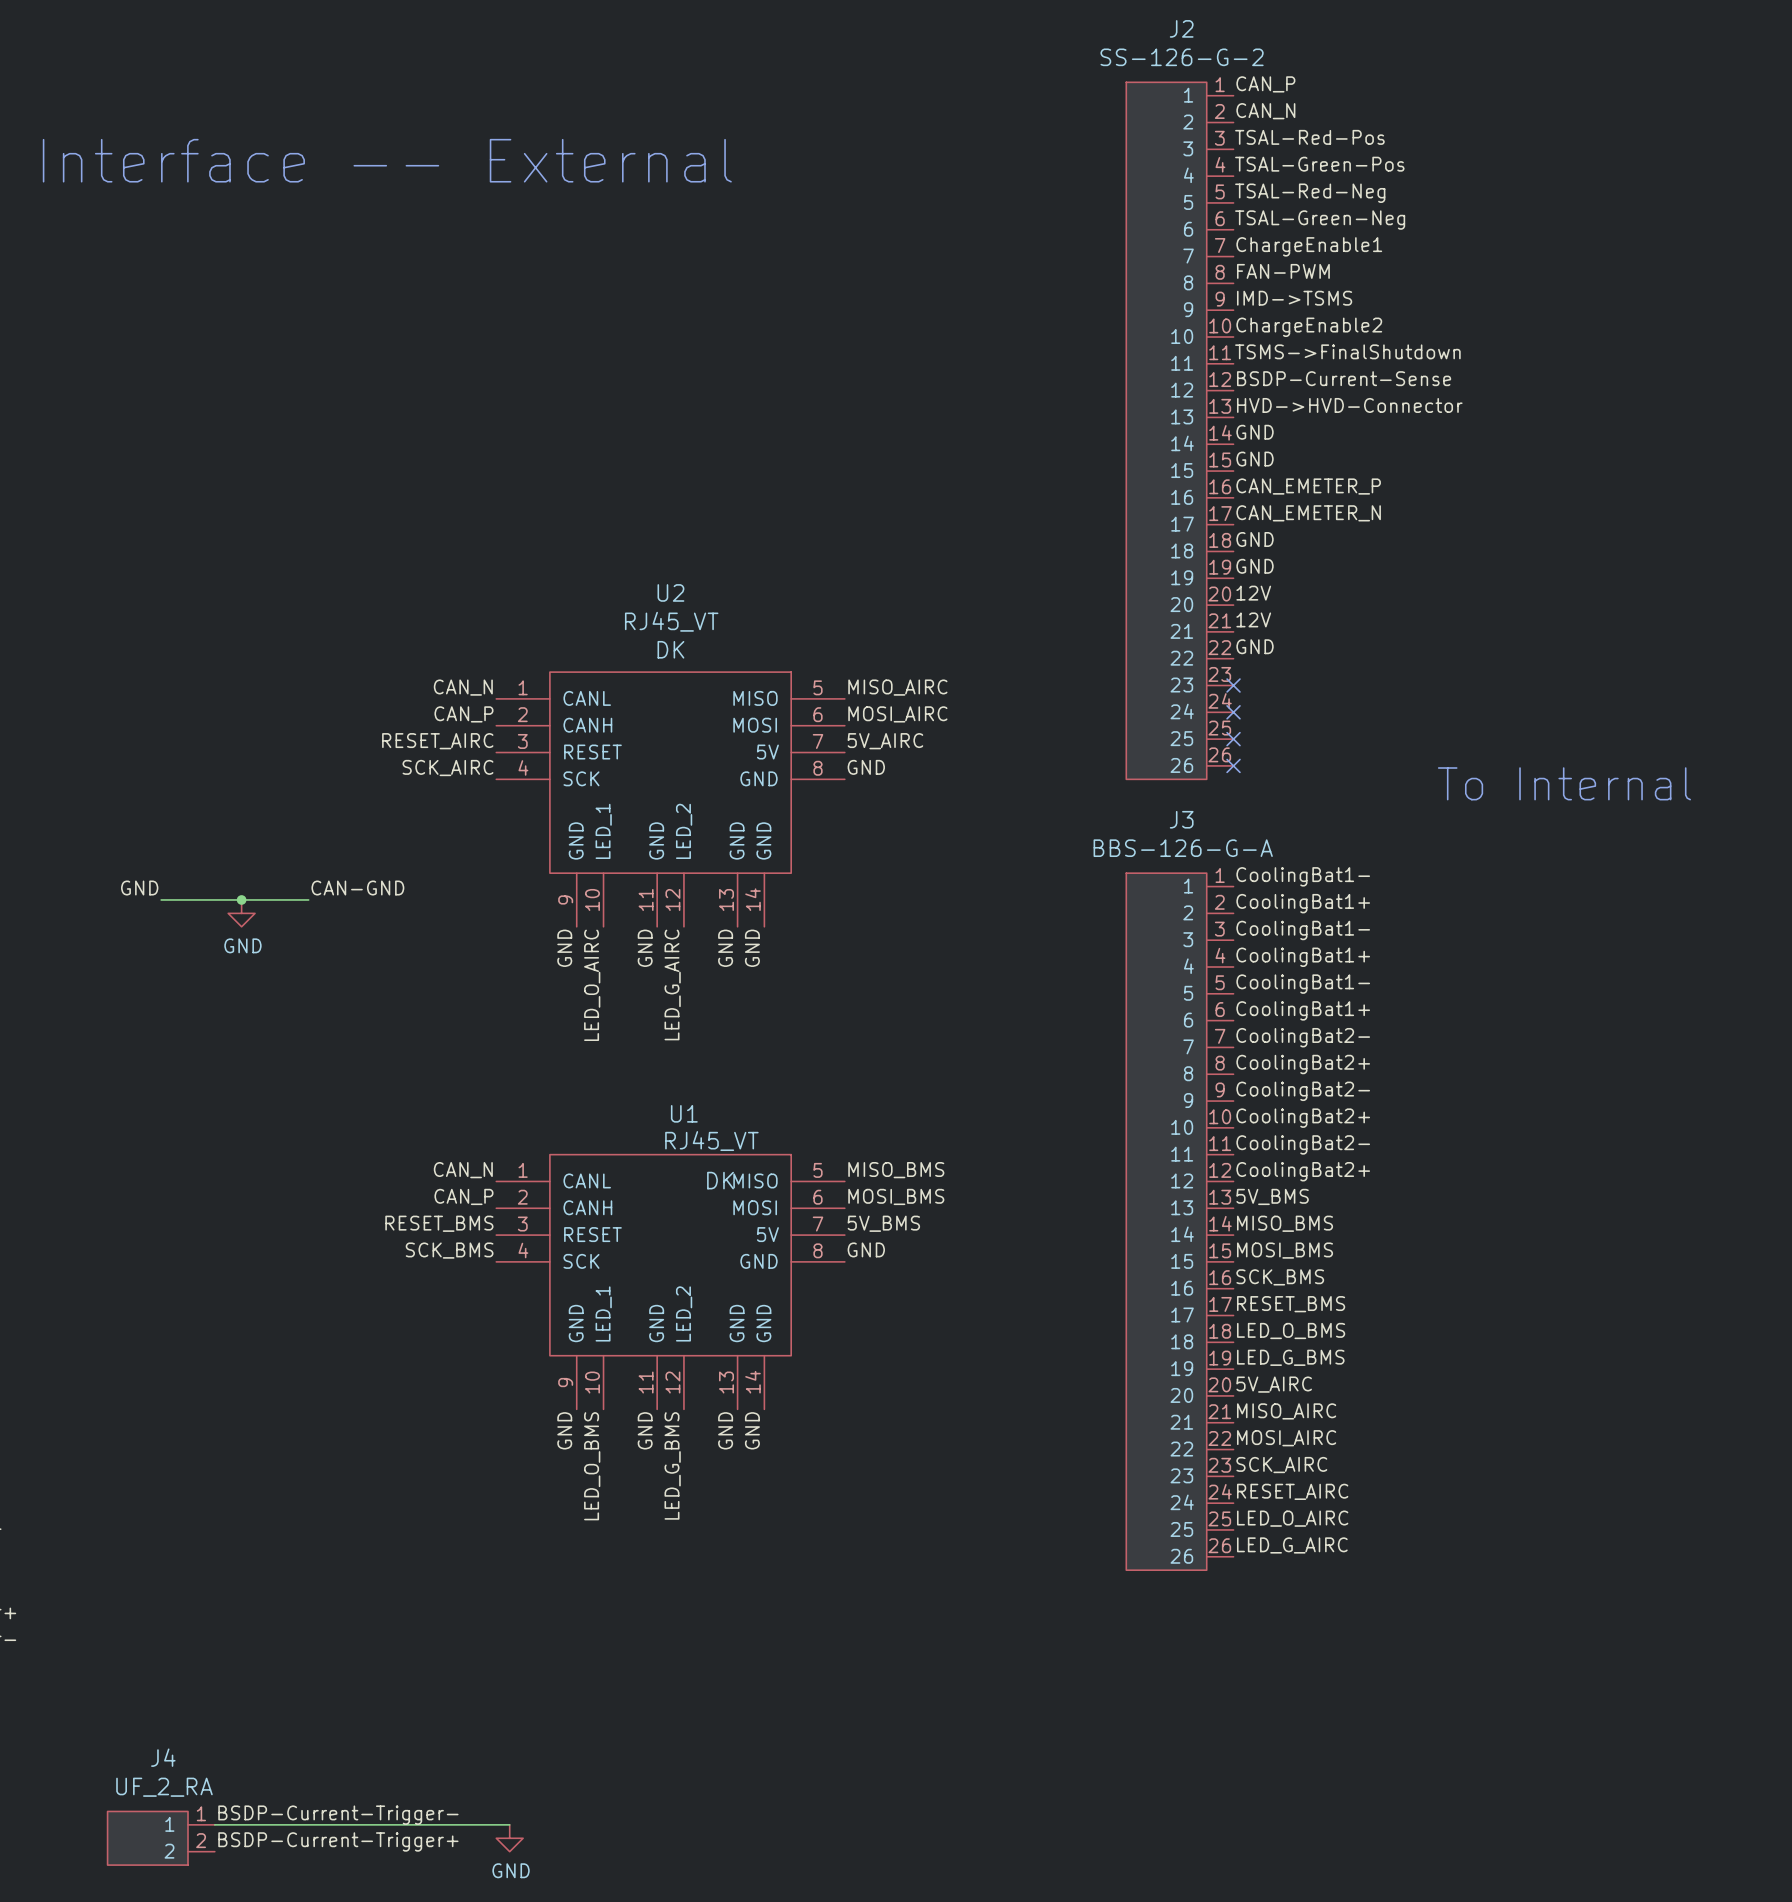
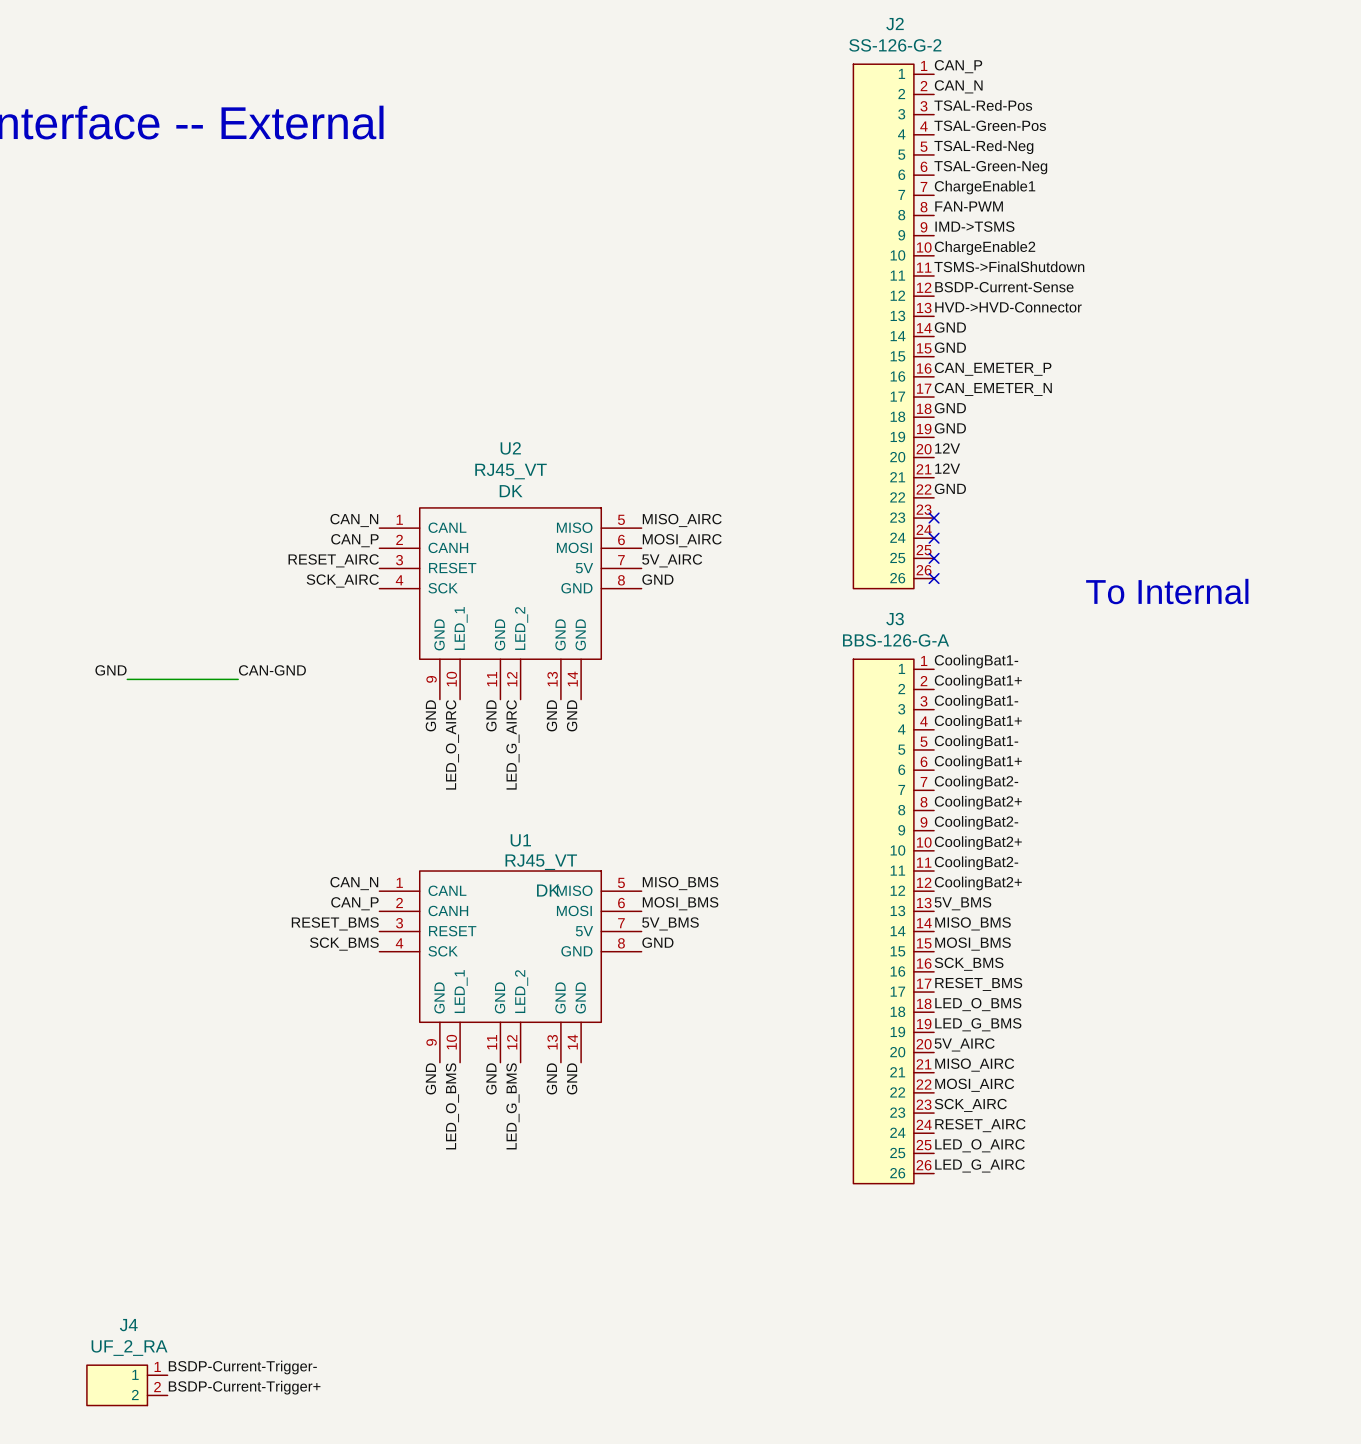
junction: (241, 899) -> none
power symbol: GND (241, 913) -> none
wire: (214, 1824) (509, 1824) -> none
power symbol: GND (509, 1838) -> none

